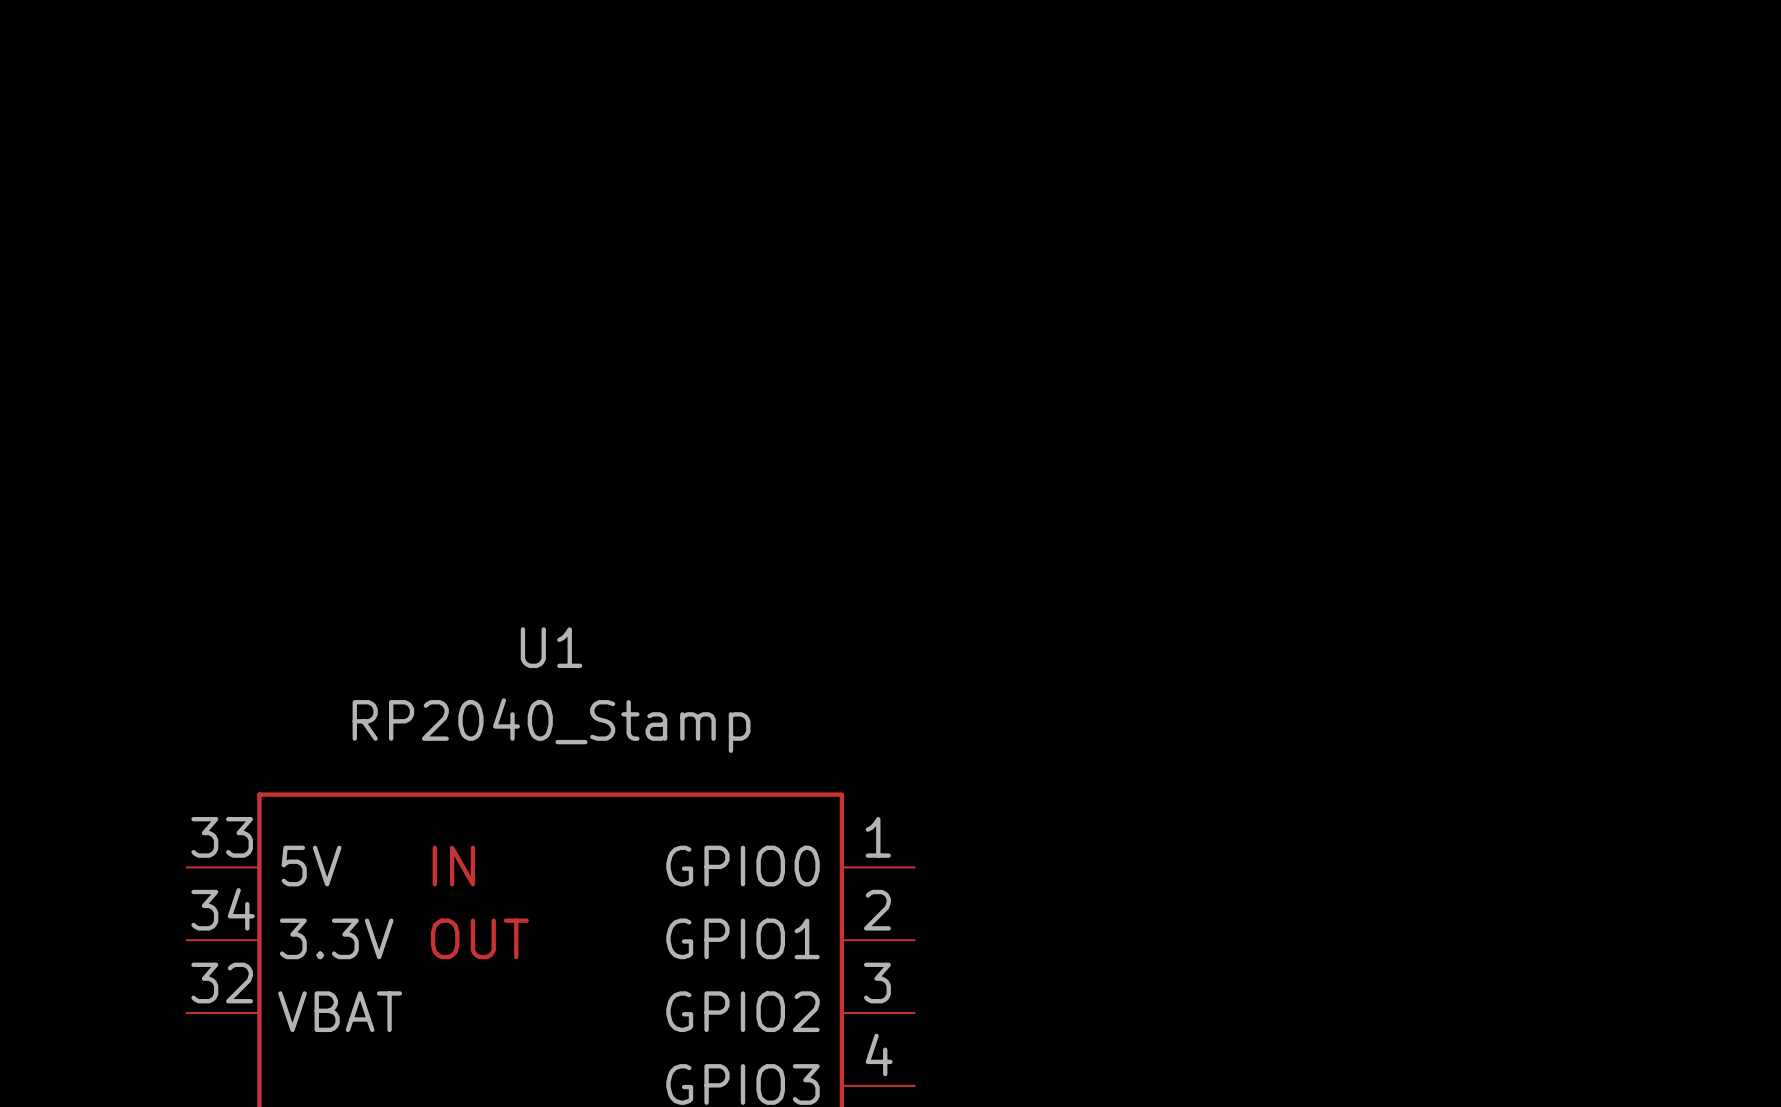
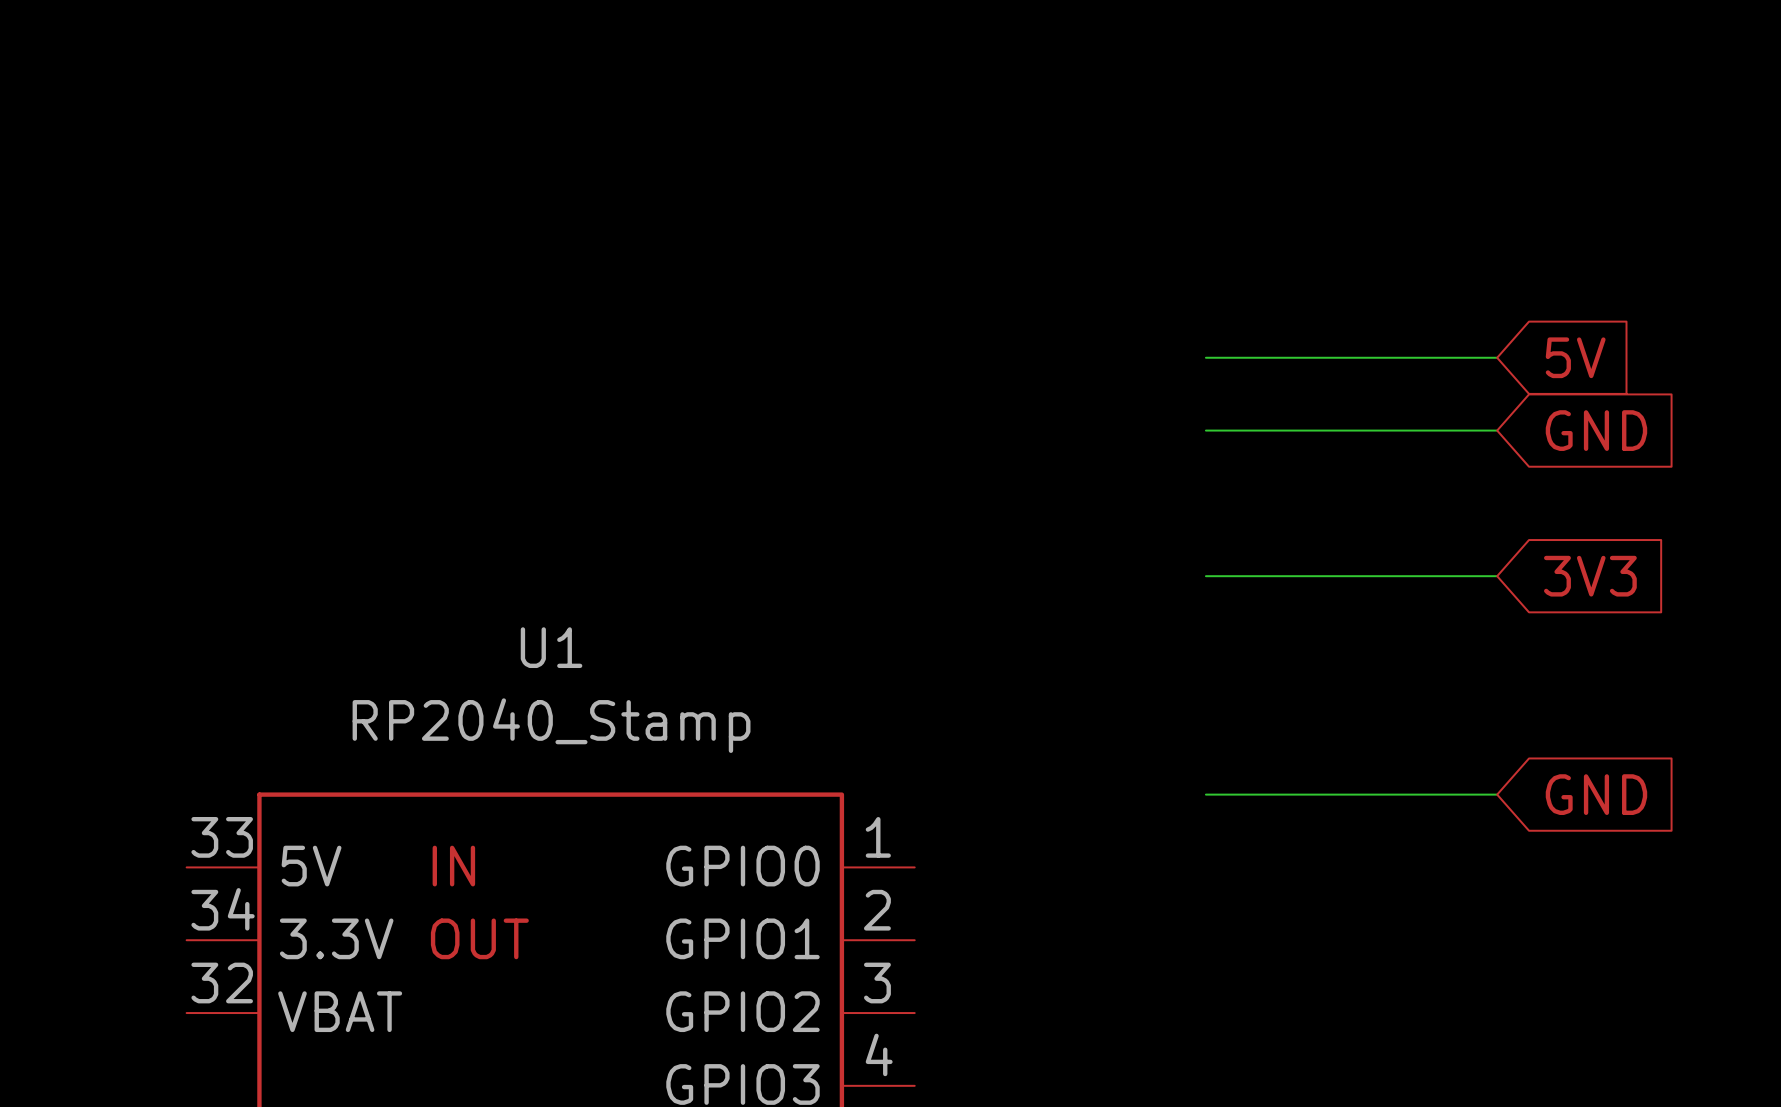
wire: none -> (1205, 357) (1497, 357)
global label: none -> 5V (1575, 357)
wire: none -> (1205, 430) (1497, 430)
global label: none -> GND (1596, 430)
wire: none -> (1205, 576) (1497, 576)
global label: none -> 3V3 (1590, 576)
wire: none -> (1205, 794) (1497, 794)
global label: none -> GND (1596, 794)

